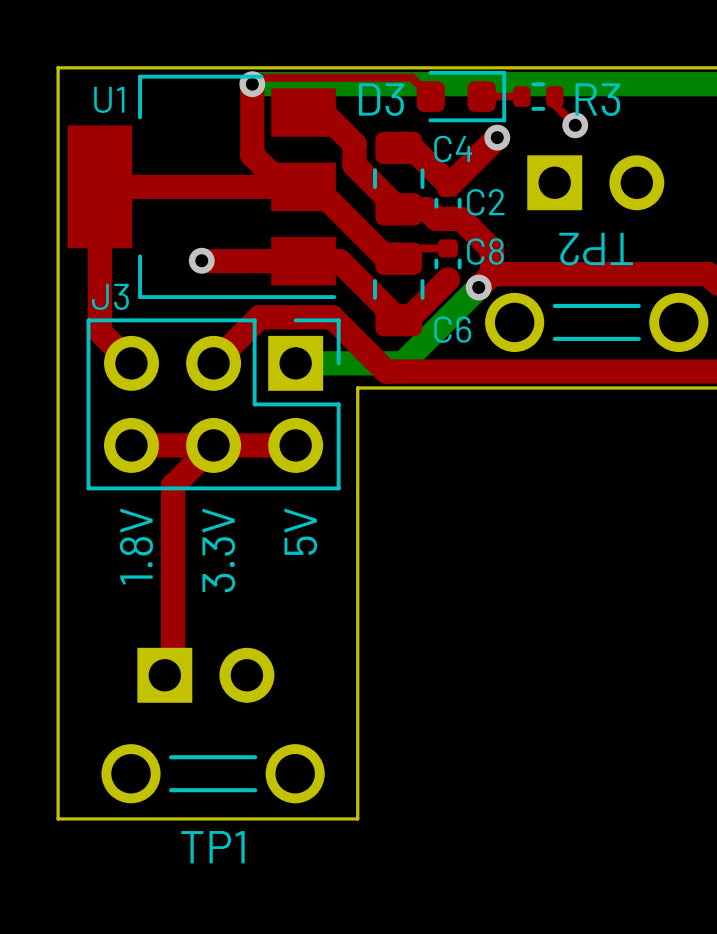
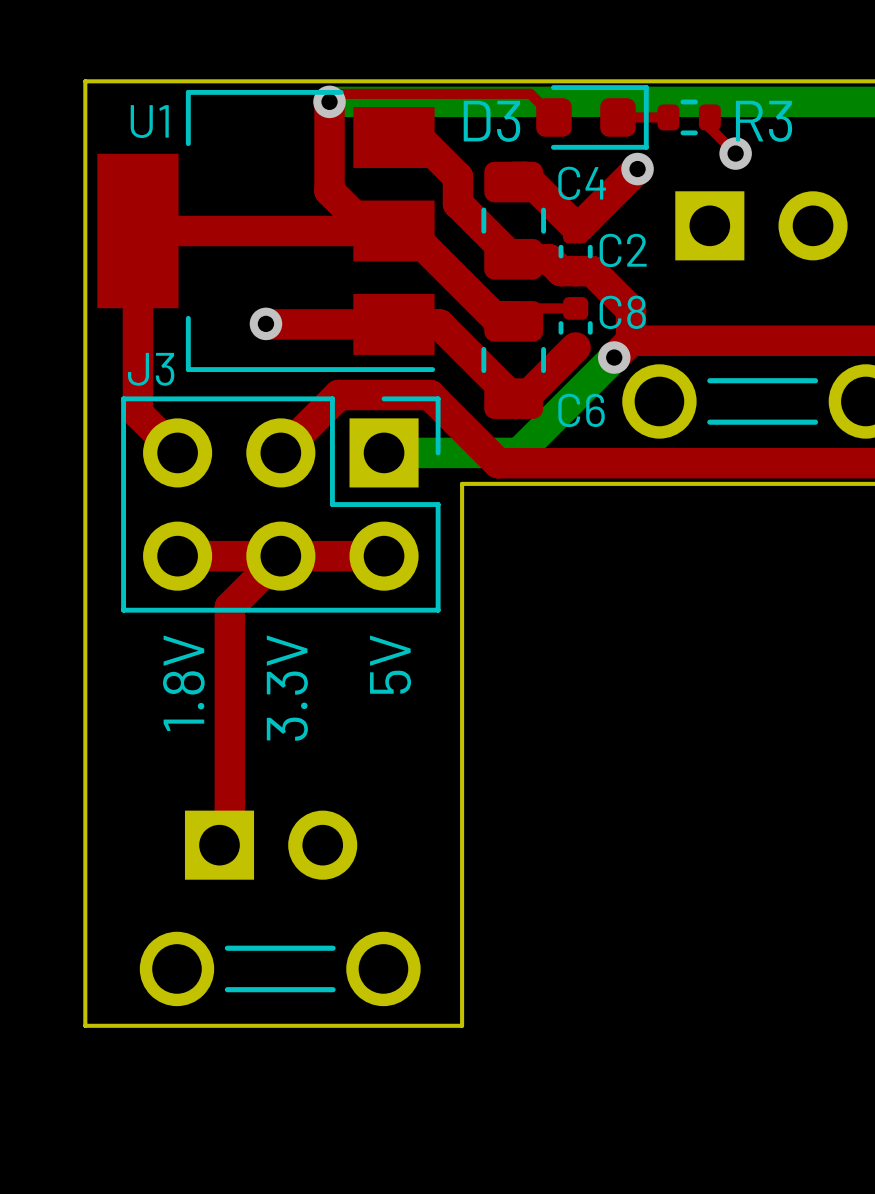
TP2 name: TP2 (596, 249) -> none
TP1 name: TP1 (212, 847) -> none

